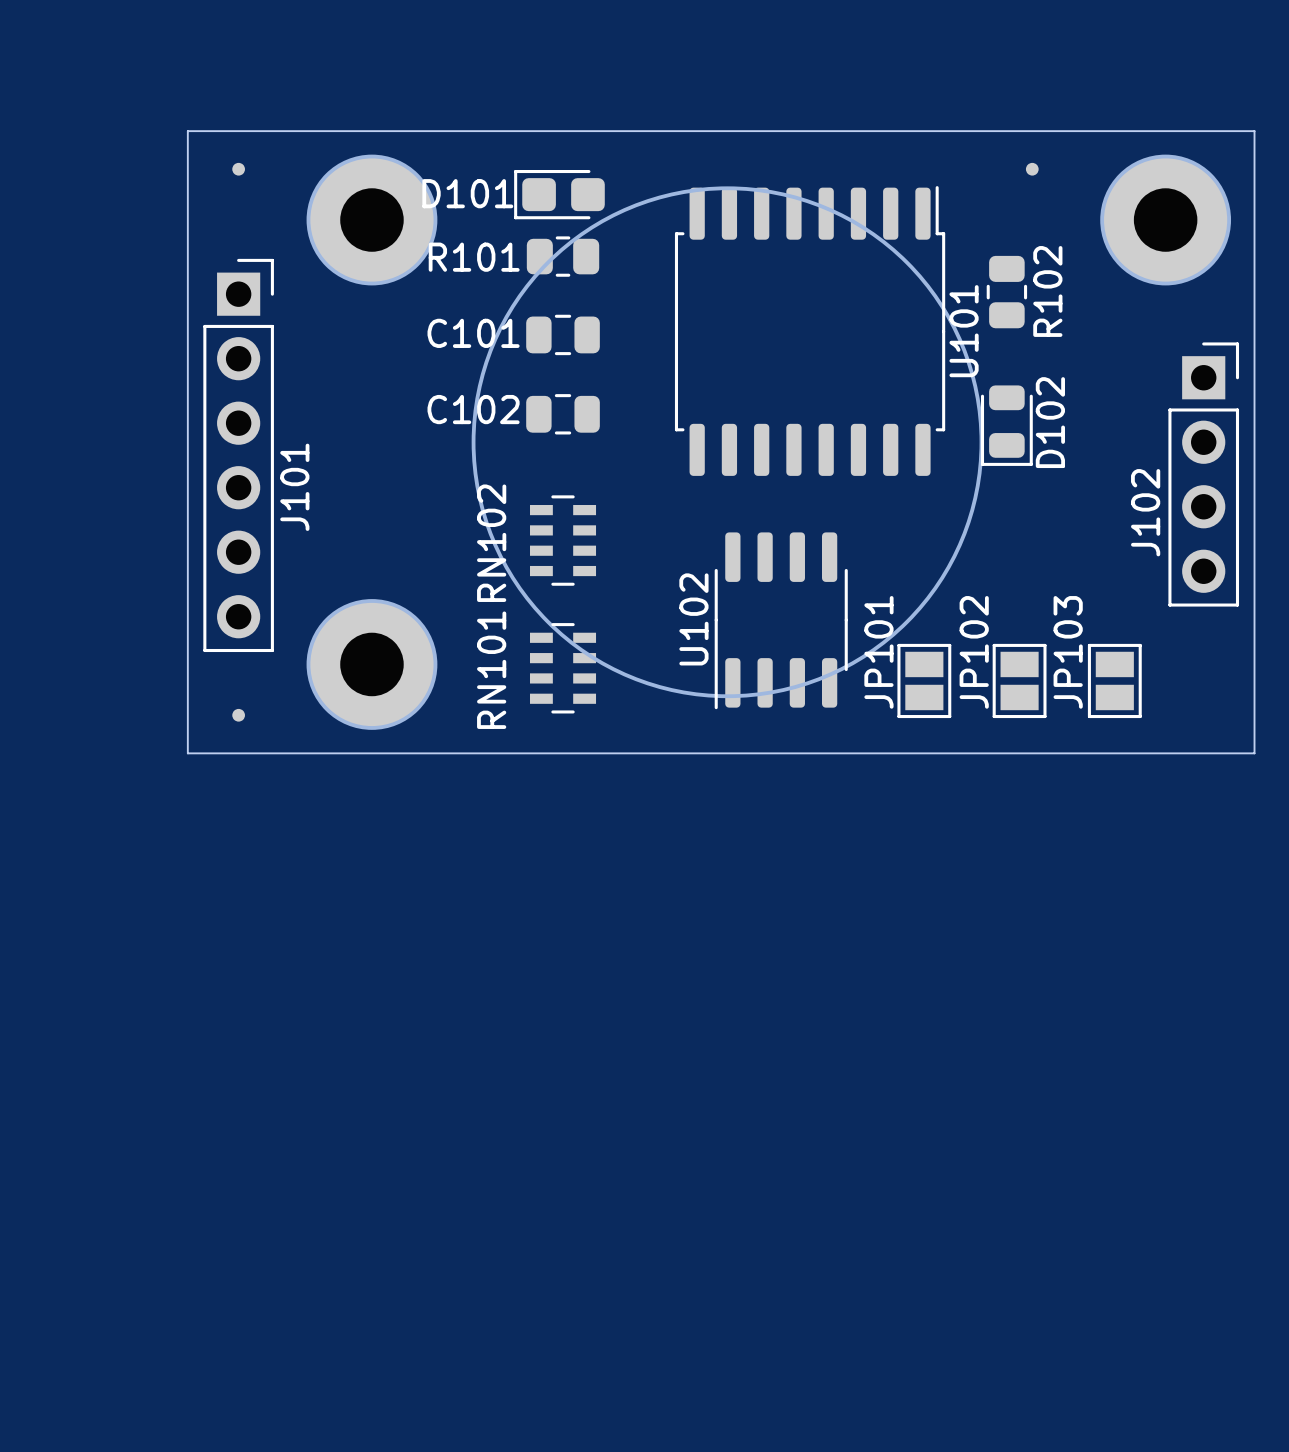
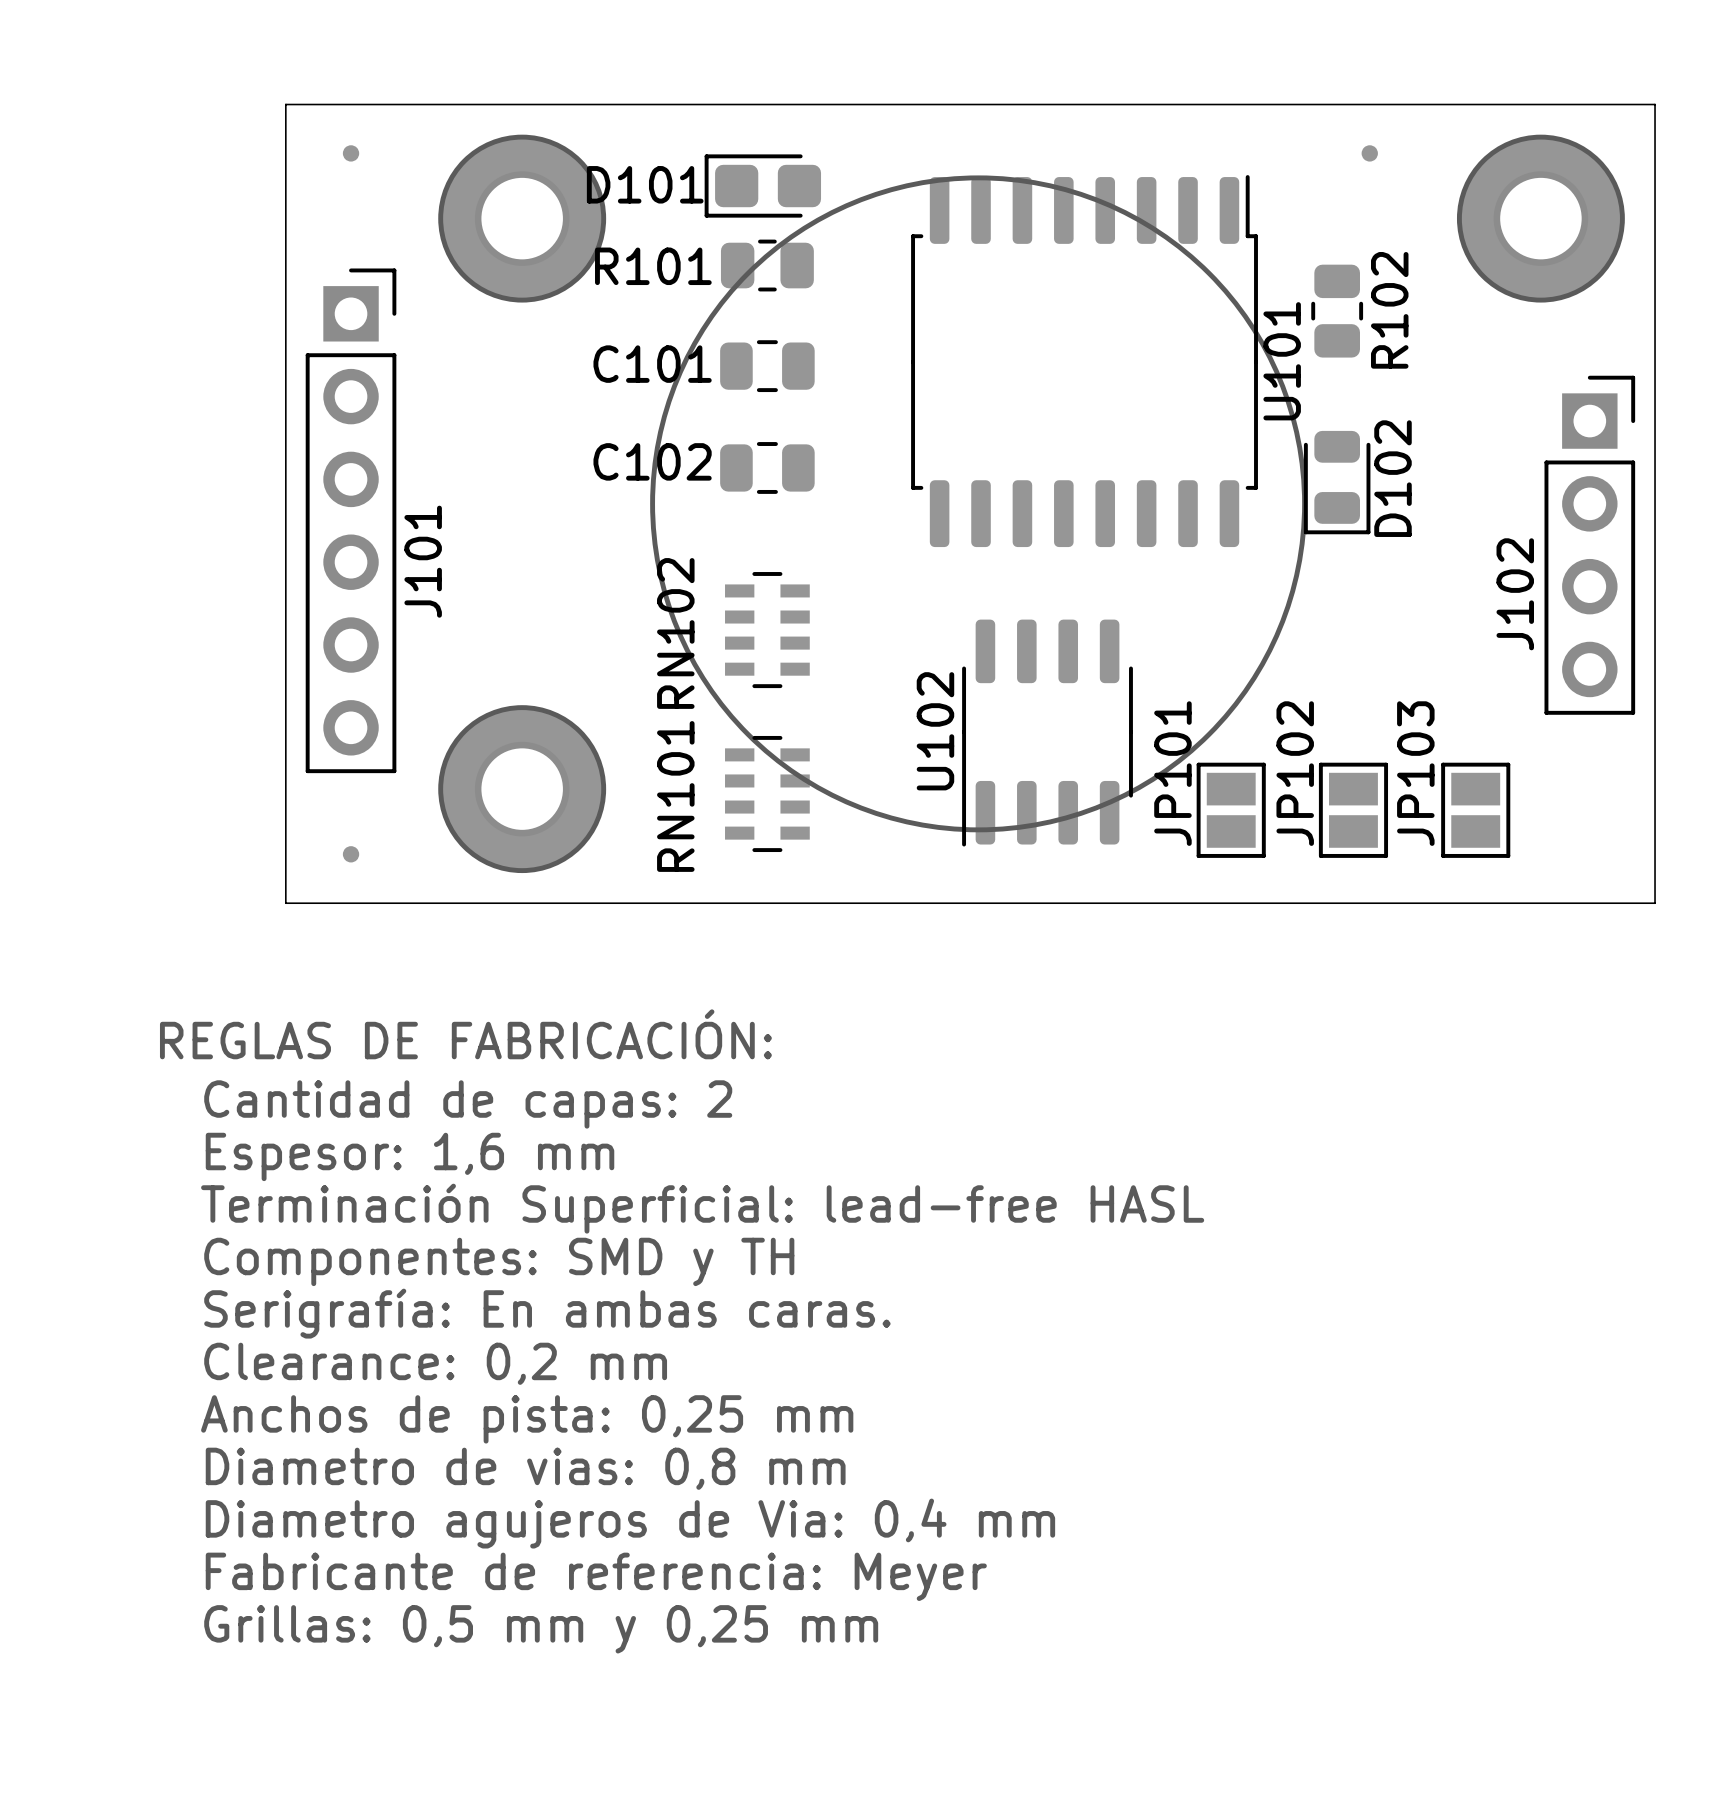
text: none -> REGLAS DE FABRICACIÓN: (465, 1034)
text: none -> Cantidad de capas: 2 (468, 1104)
text: none -> Espesor: 1,6 mm (410, 1156)
text: none -> Terminación Superficial: lead-free HASL (702, 1208)
text: none -> Componentes: SMD y TH (499, 1261)
text: none -> Serigrafía: En ambas caras. (547, 1313)
text: none -> Clearance: 0,2 mm (435, 1363)
text: none -> Anchos de pista: 0,25 mm (527, 1419)
text: none -> Diametro de vias: 0,8 mm (525, 1468)
text: none -> Diametro agujeros de Via: 0,4 mm (630, 1523)
text: none -> Fabricante de referencia: Meyer (596, 1576)
text: none -> Grillas: 0,5 mm y 0,25 mm (541, 1629)

